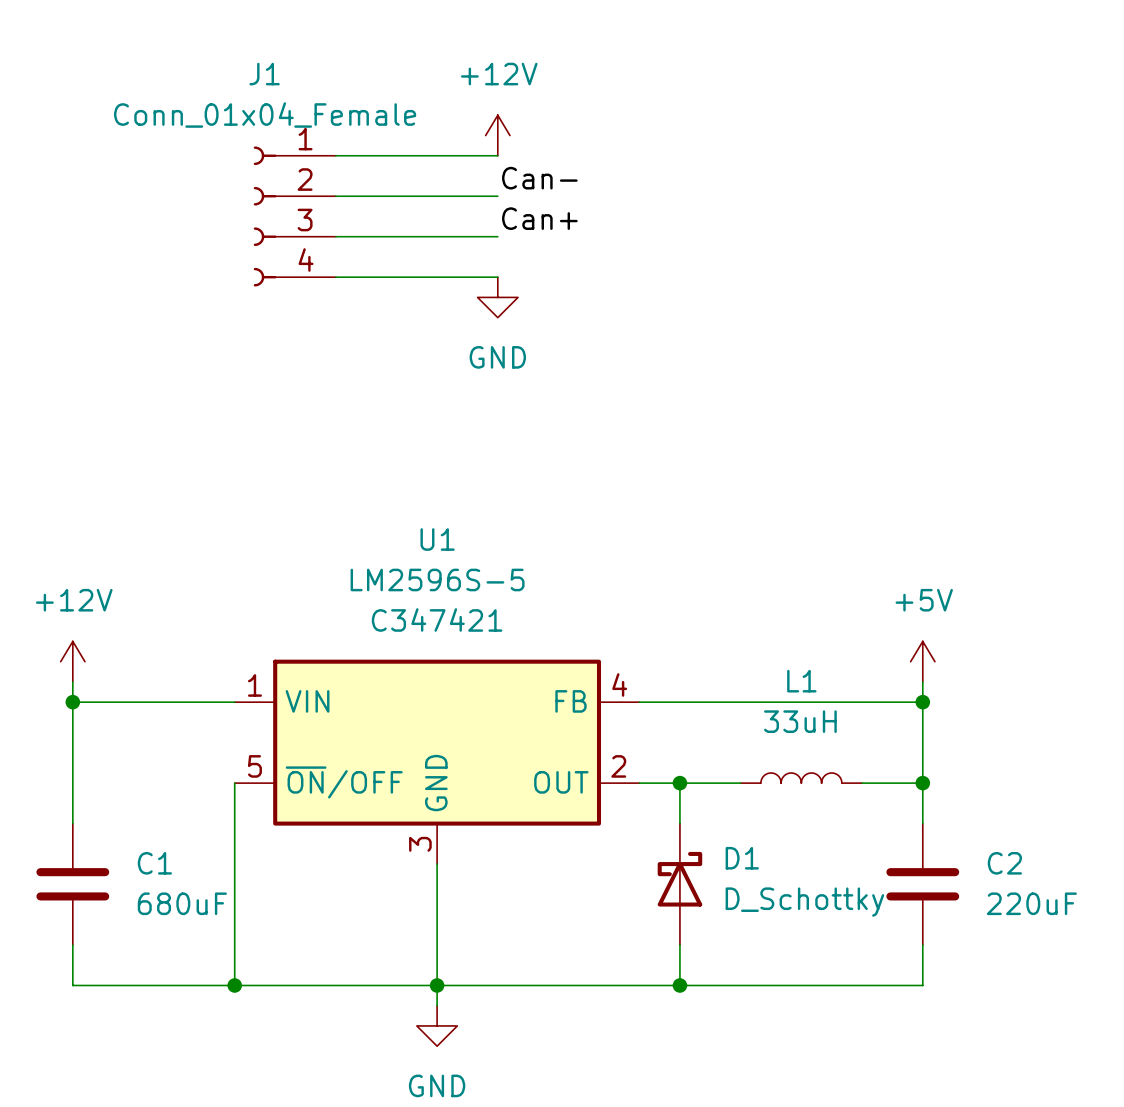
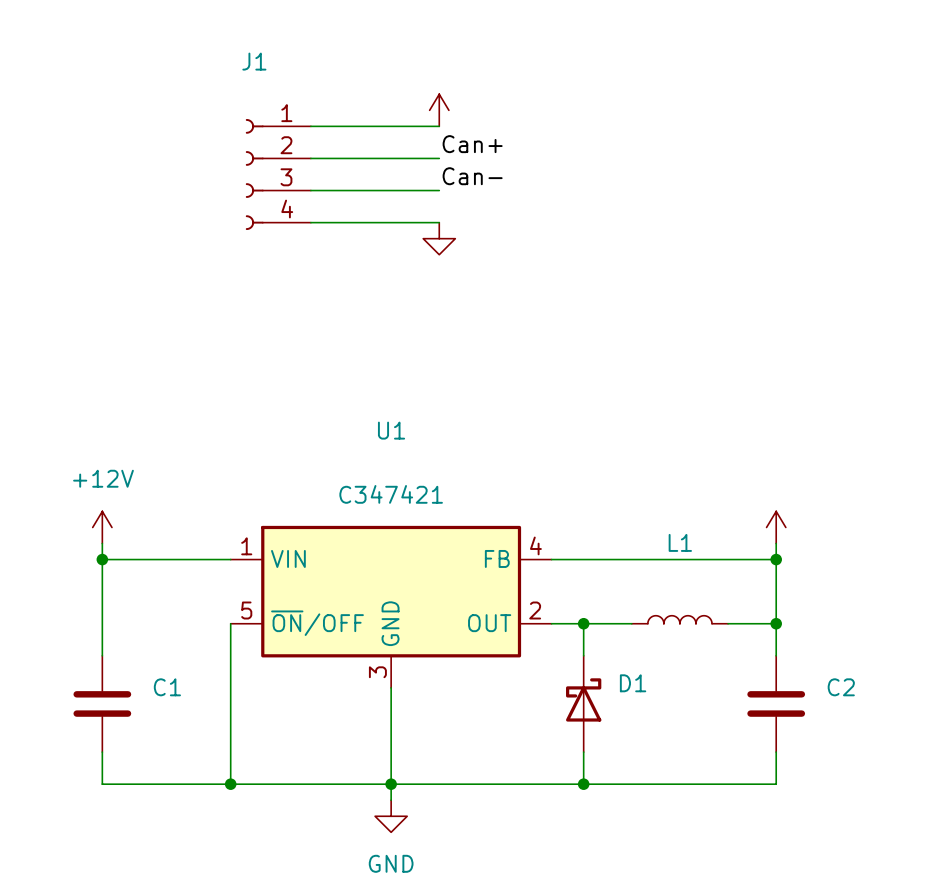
power symbol text: +12V (499, 74) -> none
J1 value: Conn_01x04_Female (265, 115) -> none
label: Can- (539, 178) -> Can+ (472, 144)
label: Can+ (539, 218) -> Can- (472, 176)
power symbol text: GND (497, 357) -> none
U1 value: LM2596S-5 (437, 579) -> none
power symbol text: +5V (924, 600) -> none
L1 value: 33uH (800, 721) -> none
D1 value: D_Schottky (804, 902) -> none
C1 value: 680uF (182, 903) -> none
C2 value: 220uF (1031, 903) -> none

